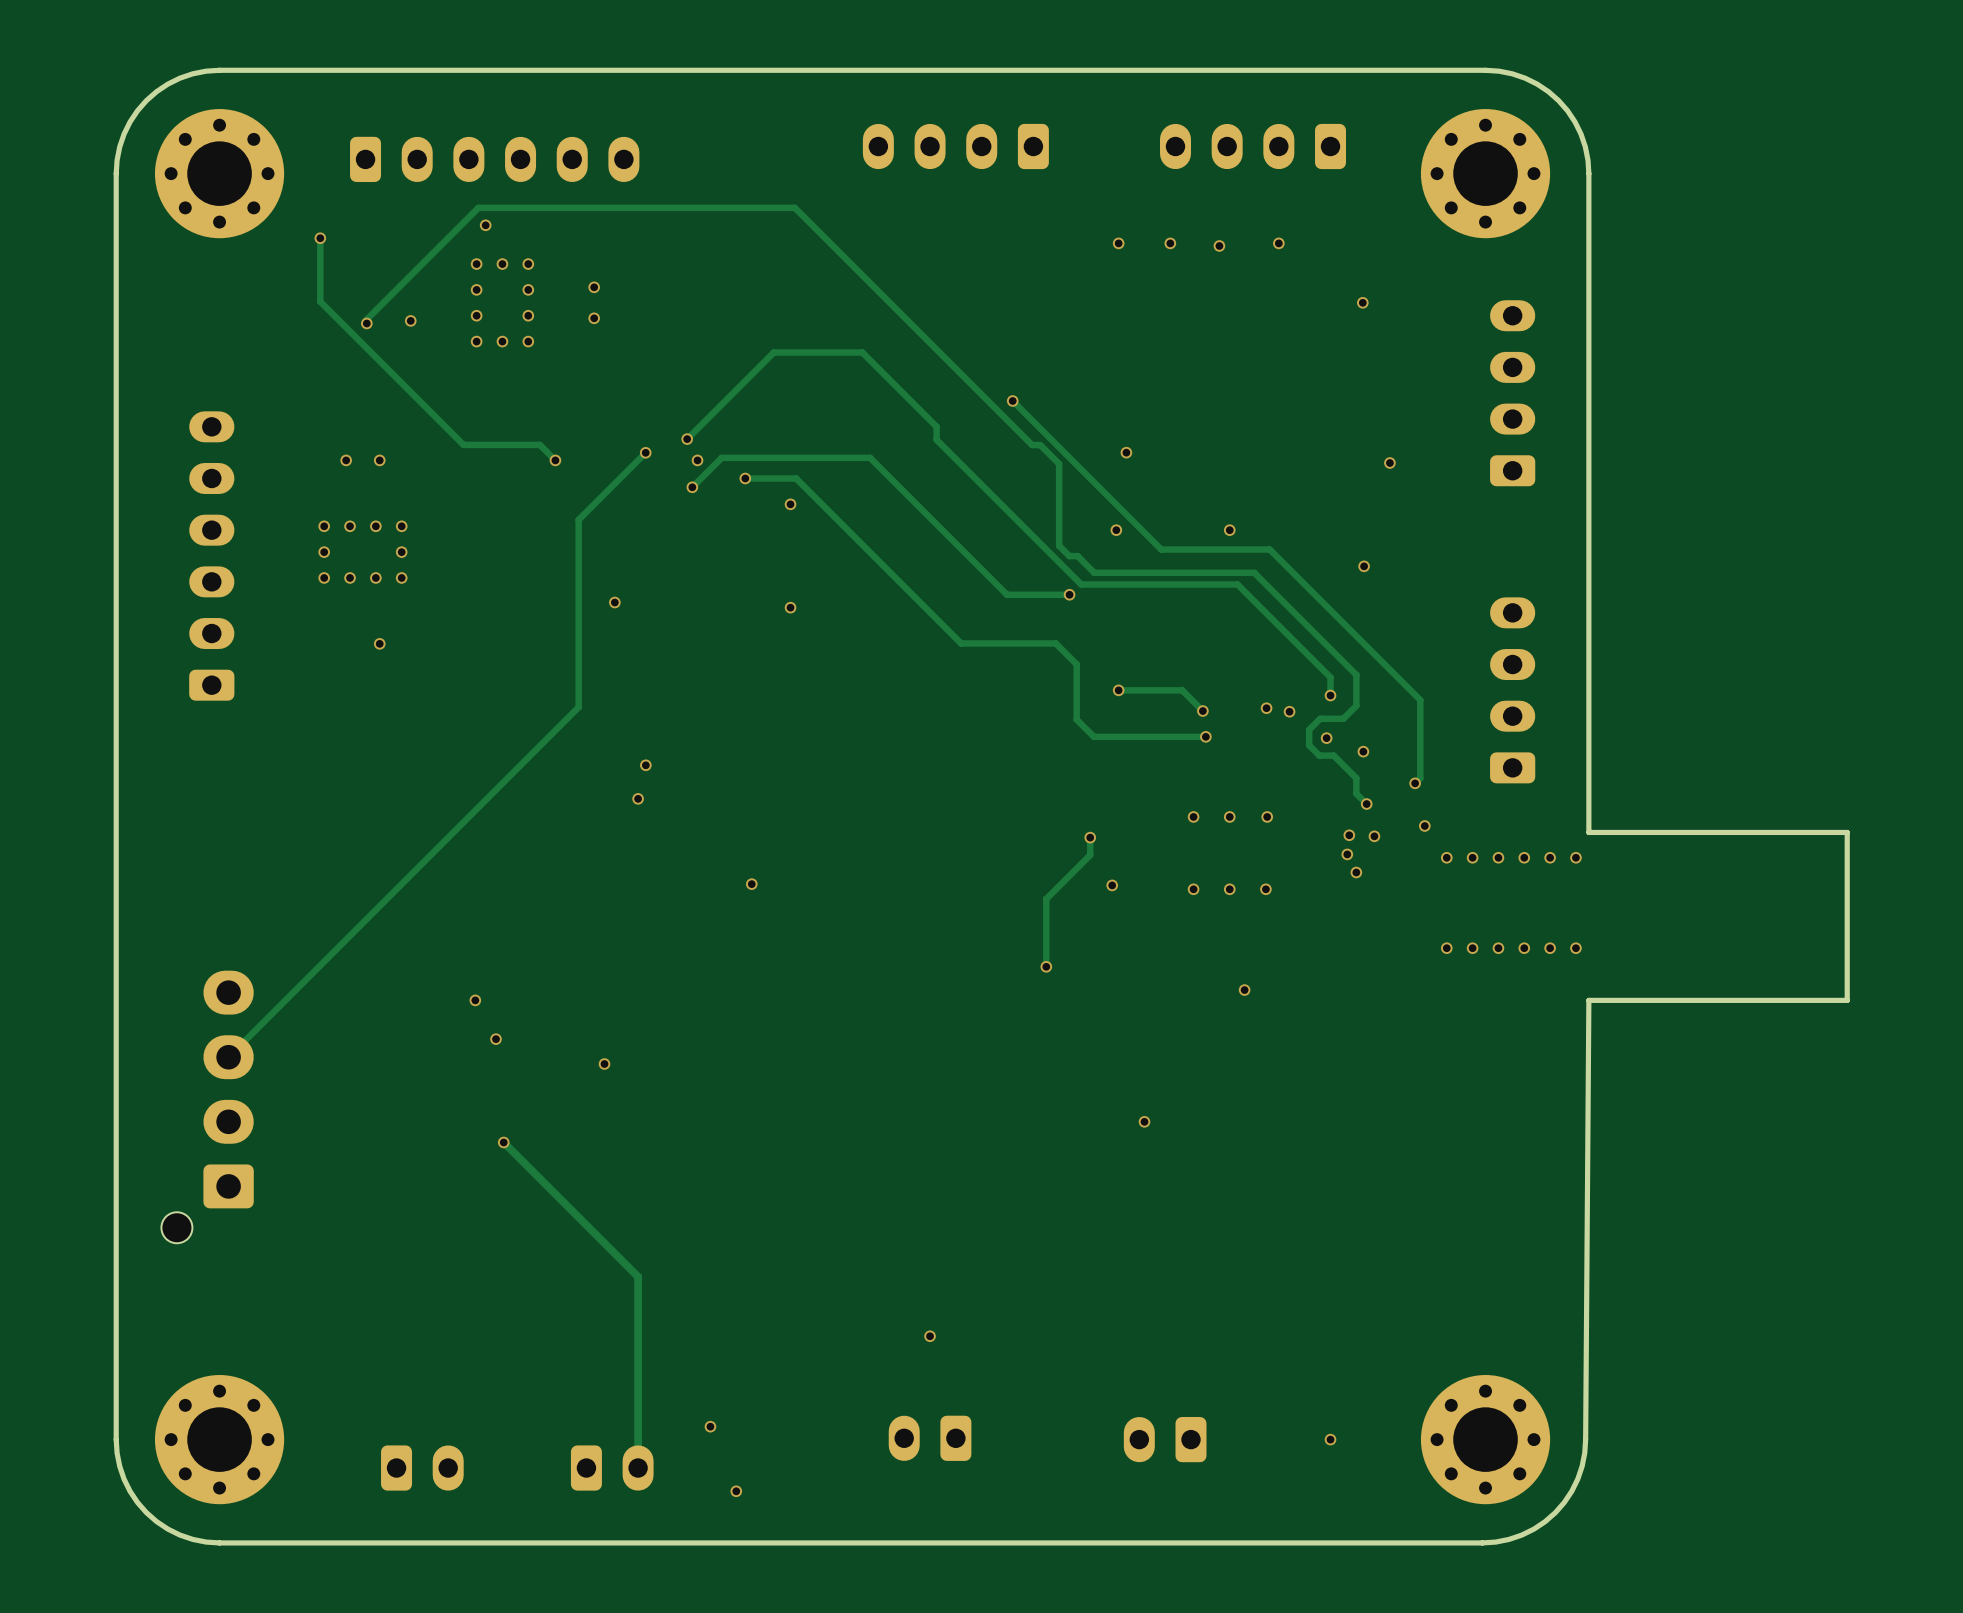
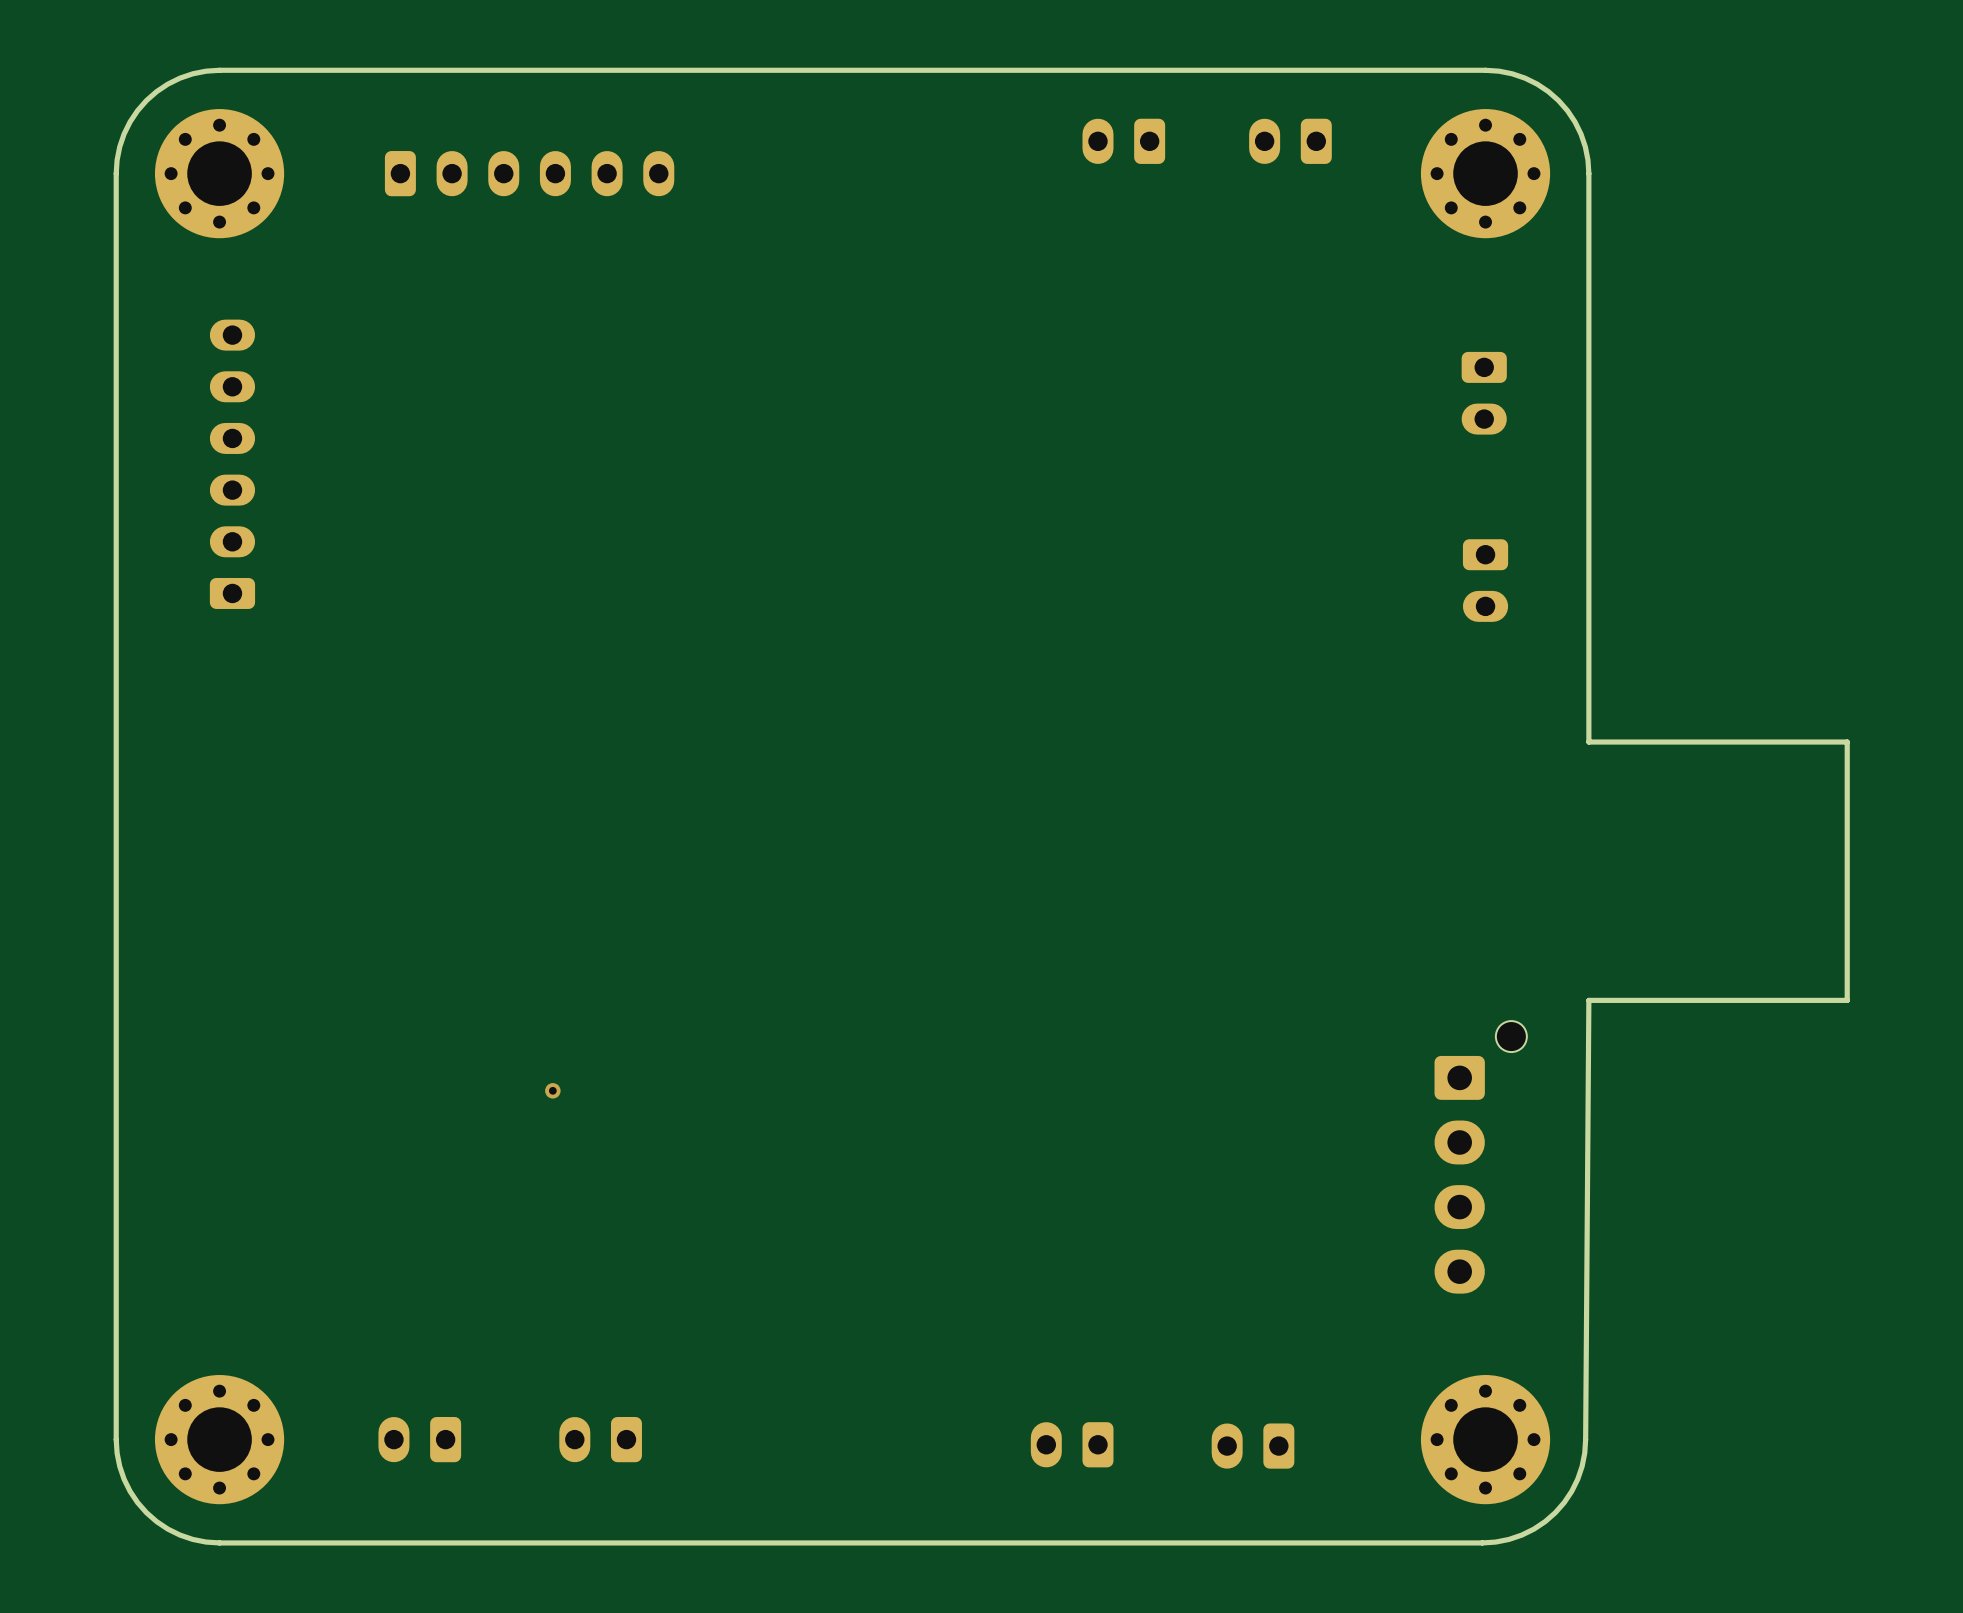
part: none -> (1123, 141)
part: none -> (1290, 141)
part: (955, 146) -> none
part: (1253, 146) -> none
part position: (494, 159) -> (529, 173)
via: (485, 225) -> none
track: (320, 238) (320, 301) (463, 444) (539, 444) (555, 460) -> none
via: (320, 238) -> none
via: (1118, 243) -> none
via: (1170, 243) -> none
via: (1278, 243) -> none
via: (1219, 245) -> none
via: (476, 264) -> none
via: (502, 264) -> none
via: (528, 264) -> none
via: (594, 287) -> none
via: (476, 289) -> none
via: (528, 289) -> none
via: (1362, 302) -> none
via: (476, 315) -> none
via: (528, 315) -> none
via: (594, 318) -> none
via: (410, 320) -> none
track: (366, 323) (366, 319) (478, 207) (794, 207) (1032, 445) (1040, 445) (1059, 463) (1059, 545) (1069, 556) (1077, 556) (1094, 572) (1254, 572) (1356, 674) (1356, 705) (1343, 718) (1320, 718) (1309, 729) (1309, 745) (1319, 755) (1333, 755) (1356, 778) (1356, 793) (1366, 804) -> none
via: (366, 323) -> none
via: (476, 341) -> none
via: (502, 341) -> none
via: (528, 341) -> none
part: none -> (1484, 393)
part: (1512, 393) -> none
track: (1012, 400) (1161, 549) (1269, 549) (1420, 700) (1420, 778) (1415, 783) -> none
via: (1012, 400) -> none
track: (687, 439) (773, 352) (862, 352) (936, 426) (936, 439) (1081, 584) (1237, 584) (1330, 677) (1330, 695) -> none
via: (687, 439) -> none
track: (645, 452) (578, 519) (578, 707) (228, 1057) -> none
via: (645, 452) -> none
via: (1126, 452) -> none
via: (346, 460) -> none
via: (379, 460) -> none
via: (555, 460) -> none
via: (697, 460) -> none
via: (1389, 463) -> none
track: (745, 478) (796, 478) (961, 643) (1055, 643) (1076, 664) (1076, 719) (1093, 736) (1205, 736) -> none
via: (745, 478) -> none
track: (692, 487) (721, 457) (870, 457) (1007, 594) (1069, 594) -> none
via: (692, 487) -> none
via: (790, 504) -> none
via: (324, 526) -> none
via: (350, 526) -> none
via: (375, 526) -> none
via: (401, 526) -> none
via: (1116, 530) -> none
via: (1229, 530) -> none
via: (324, 552) -> none
via: (401, 552) -> none
part position: (211, 556) -> (232, 464)
via: (1364, 566) -> none
via: (324, 577) -> none
via: (350, 577) -> none
via: (375, 577) -> none
via: (401, 577) -> none
part: none -> (1485, 580)
via: (1069, 594) -> none
via: (614, 602) -> none
via: (790, 607) -> none
via: (379, 643) -> none
track: (1118, 690) (1182, 690) (1202, 711) -> none
via: (1118, 690) -> none
part: (1512, 690) -> none
via: (1330, 695) -> none
via: (1266, 708) -> none
via: (1202, 711) -> none
via: (1289, 711) -> none
via: (1205, 736) -> none
via: (1326, 738) -> none
board edge: (1588, 742) (1588, 832) (1847, 832) -> (1588, 742) (1847, 742) (1847, 832)
via: (1363, 751) -> none
via: (645, 765) -> none
via: (1415, 783) -> none
via: (638, 798) -> none
via: (1366, 804) -> none
via: (1193, 816) -> none
via: (1229, 816) -> none
via: (1267, 816) -> none
via: (1424, 825) -> none
via: (1349, 835) -> none
via: (1374, 836) -> none
track: (1090, 837) (1090, 855) (1046, 898) (1046, 966) -> none
via: (1090, 837) -> none
via: (1347, 854) -> none
via: (1446, 857) -> none
via: (1472, 857) -> none
via: (1498, 857) -> none
via: (1524, 857) -> none
via: (1550, 857) -> none
via: (1575, 857) -> none
via: (1356, 872) -> none
via: (751, 884) -> none
via: (1112, 885) -> none
via: (1193, 889) -> none
via: (1229, 889) -> none
via: (1265, 889) -> none
via: (1446, 948) -> none
via: (1472, 948) -> none
via: (1498, 948) -> none
via: (1524, 948) -> none
via: (1550, 948) -> none
via: (1575, 948) -> none
via: (1046, 966) -> none
via: (1244, 990) -> none
via: (475, 1000) -> none
via: (496, 1039) -> none
via: (604, 1064) -> none
via: none -> (552, 1090)
part: (207, 1106) -> none
via: (1144, 1121) -> none
track: (503, 1142) (638, 1276) (638, 1468) -> none
via: (503, 1142) -> none
part: none -> (1480, 1157)
via: (930, 1336) -> none
via: (710, 1426) -> none
part: (930, 1438) -> none
part: (1165, 1439) -> none
via: (1330, 1439) -> none
part: none -> (1072, 1444)
part: none -> (1253, 1446)
part rotation: 0° (422, 1468) -> 180° (419, 1439)
part rotation: 0° (612, 1468) -> 180° (600, 1439)
via: (736, 1491) -> none

